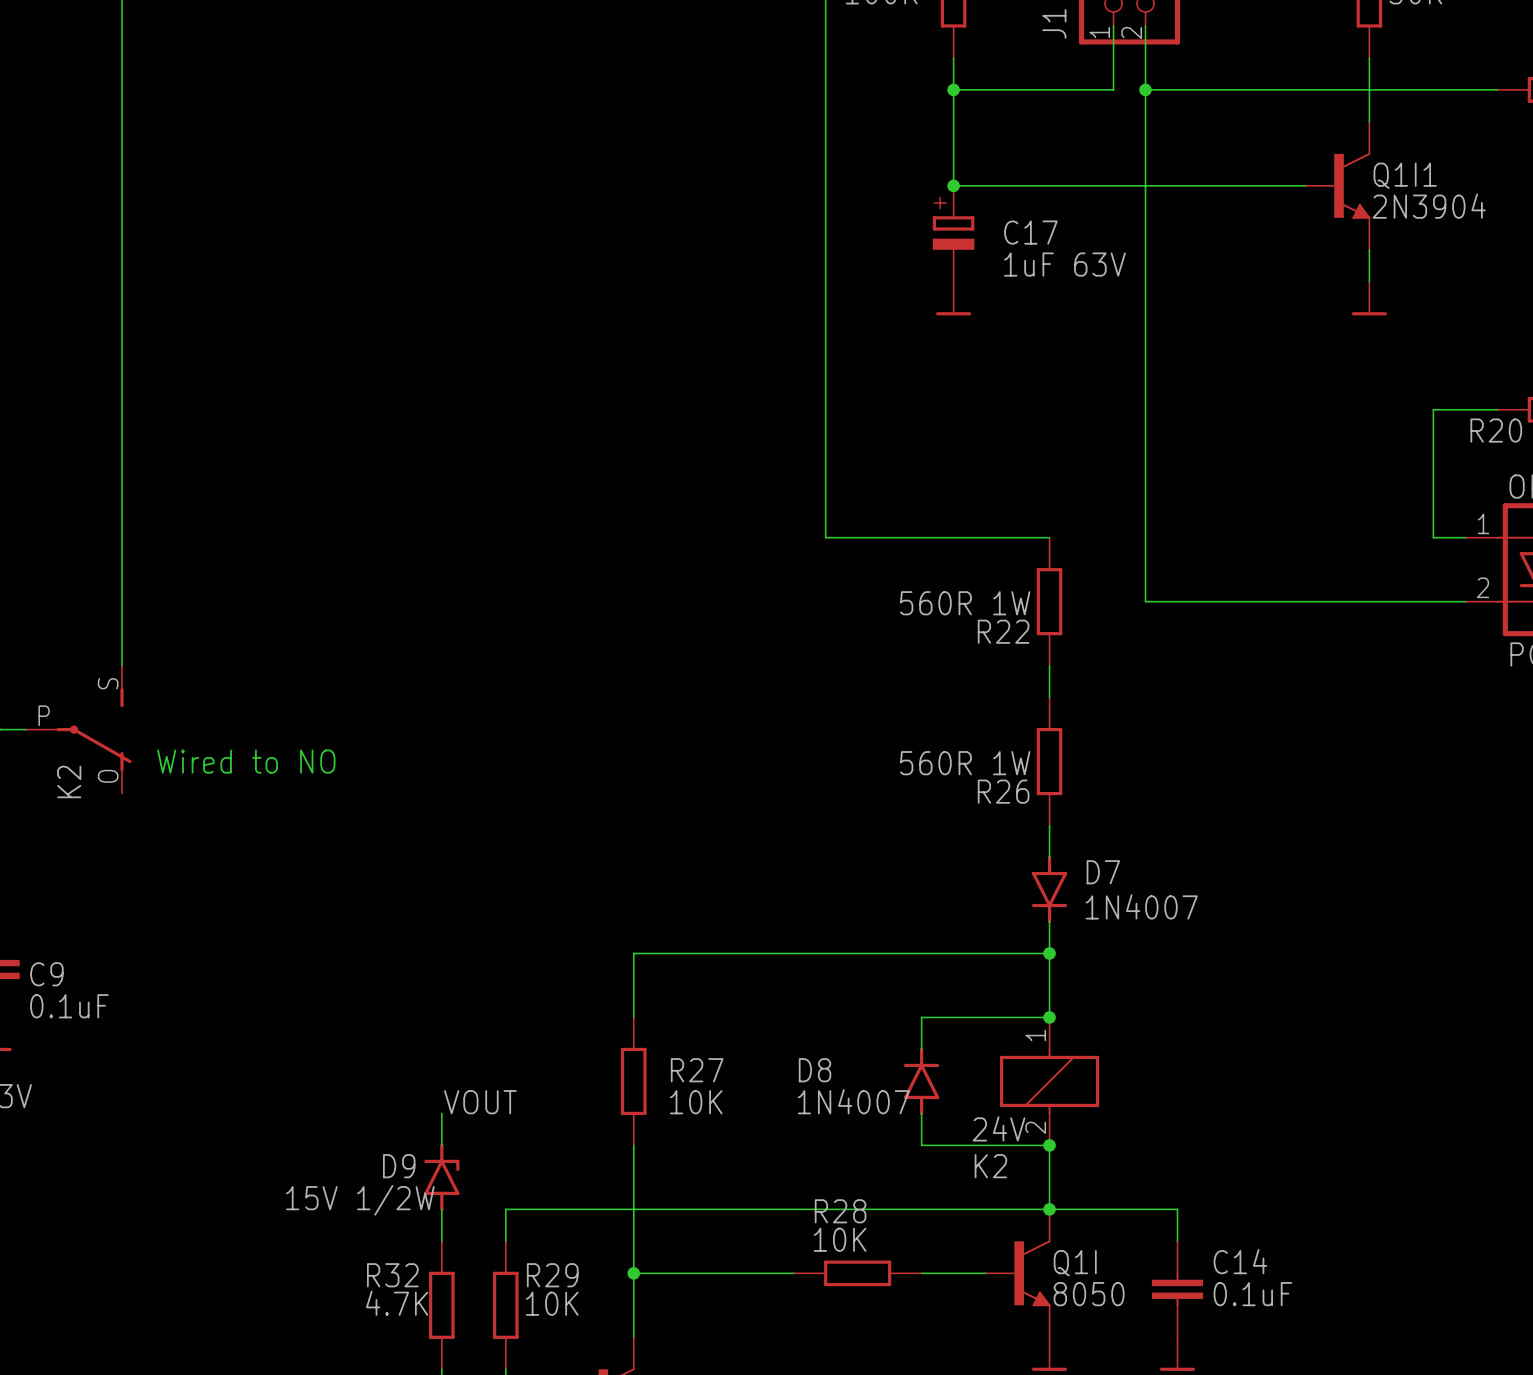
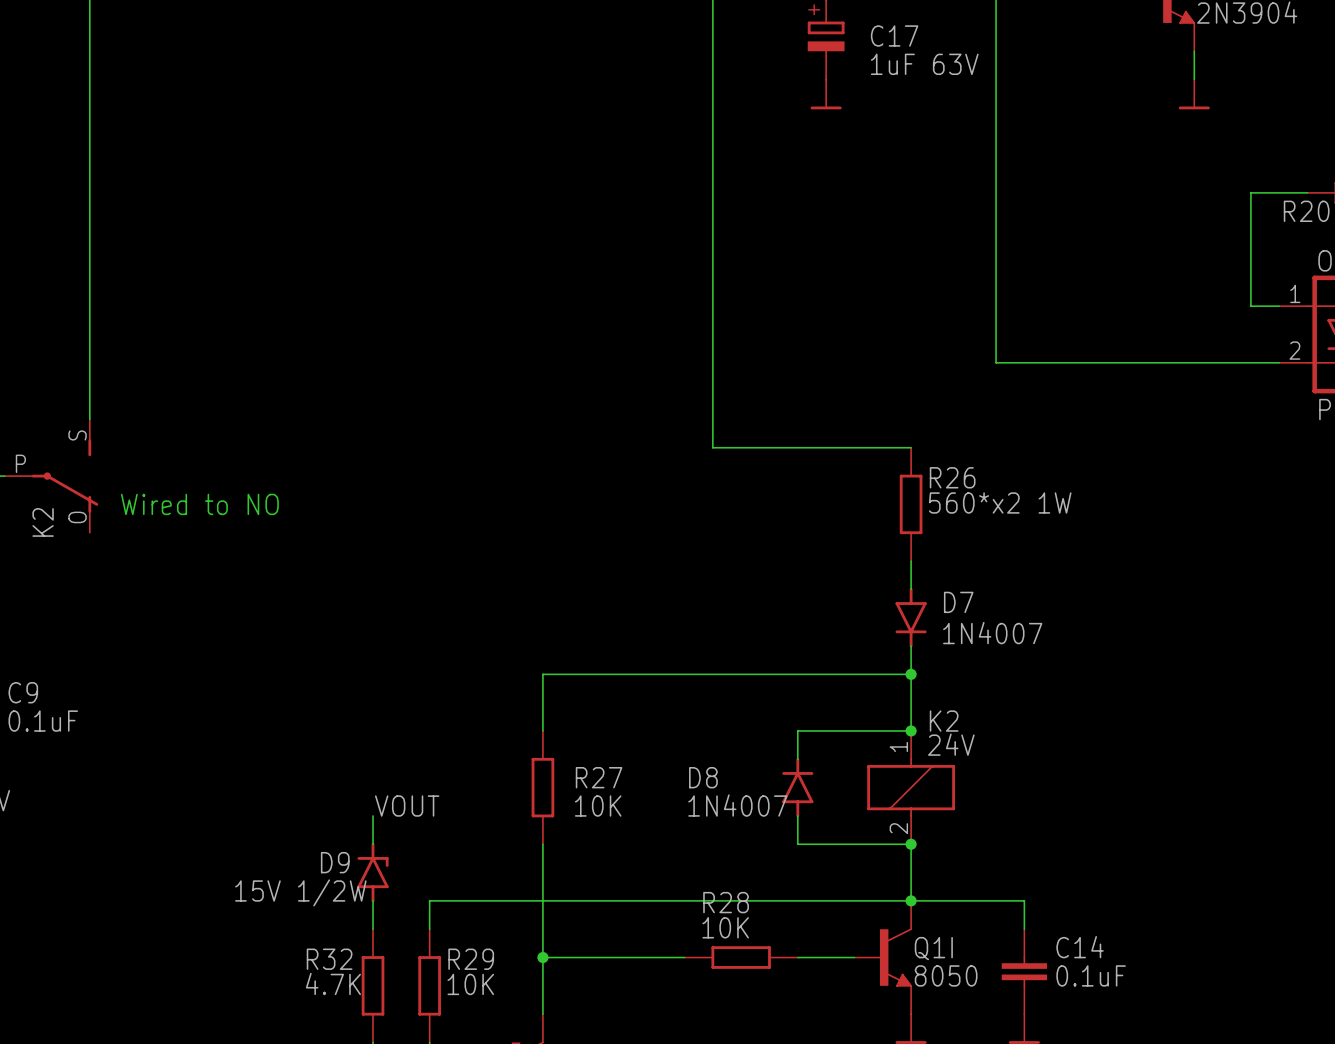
wire: (825, 537) (1049, 537) -> (712, 306) (712, 447) (911, 447)
R22: 560R 1W (1049, 601) -> none
wire: (1049, 665) (1049, 697) -> none
R26 value: 560R 1W (965, 763) -> 560*x2 1W (1000, 503)
R26 name position: R26 (1003, 791) -> R26 (952, 477)
K2 value position: 24V (999, 1128) -> 24V (951, 744)
K2 name position: K2 (990, 1166) -> K2 (944, 721)

